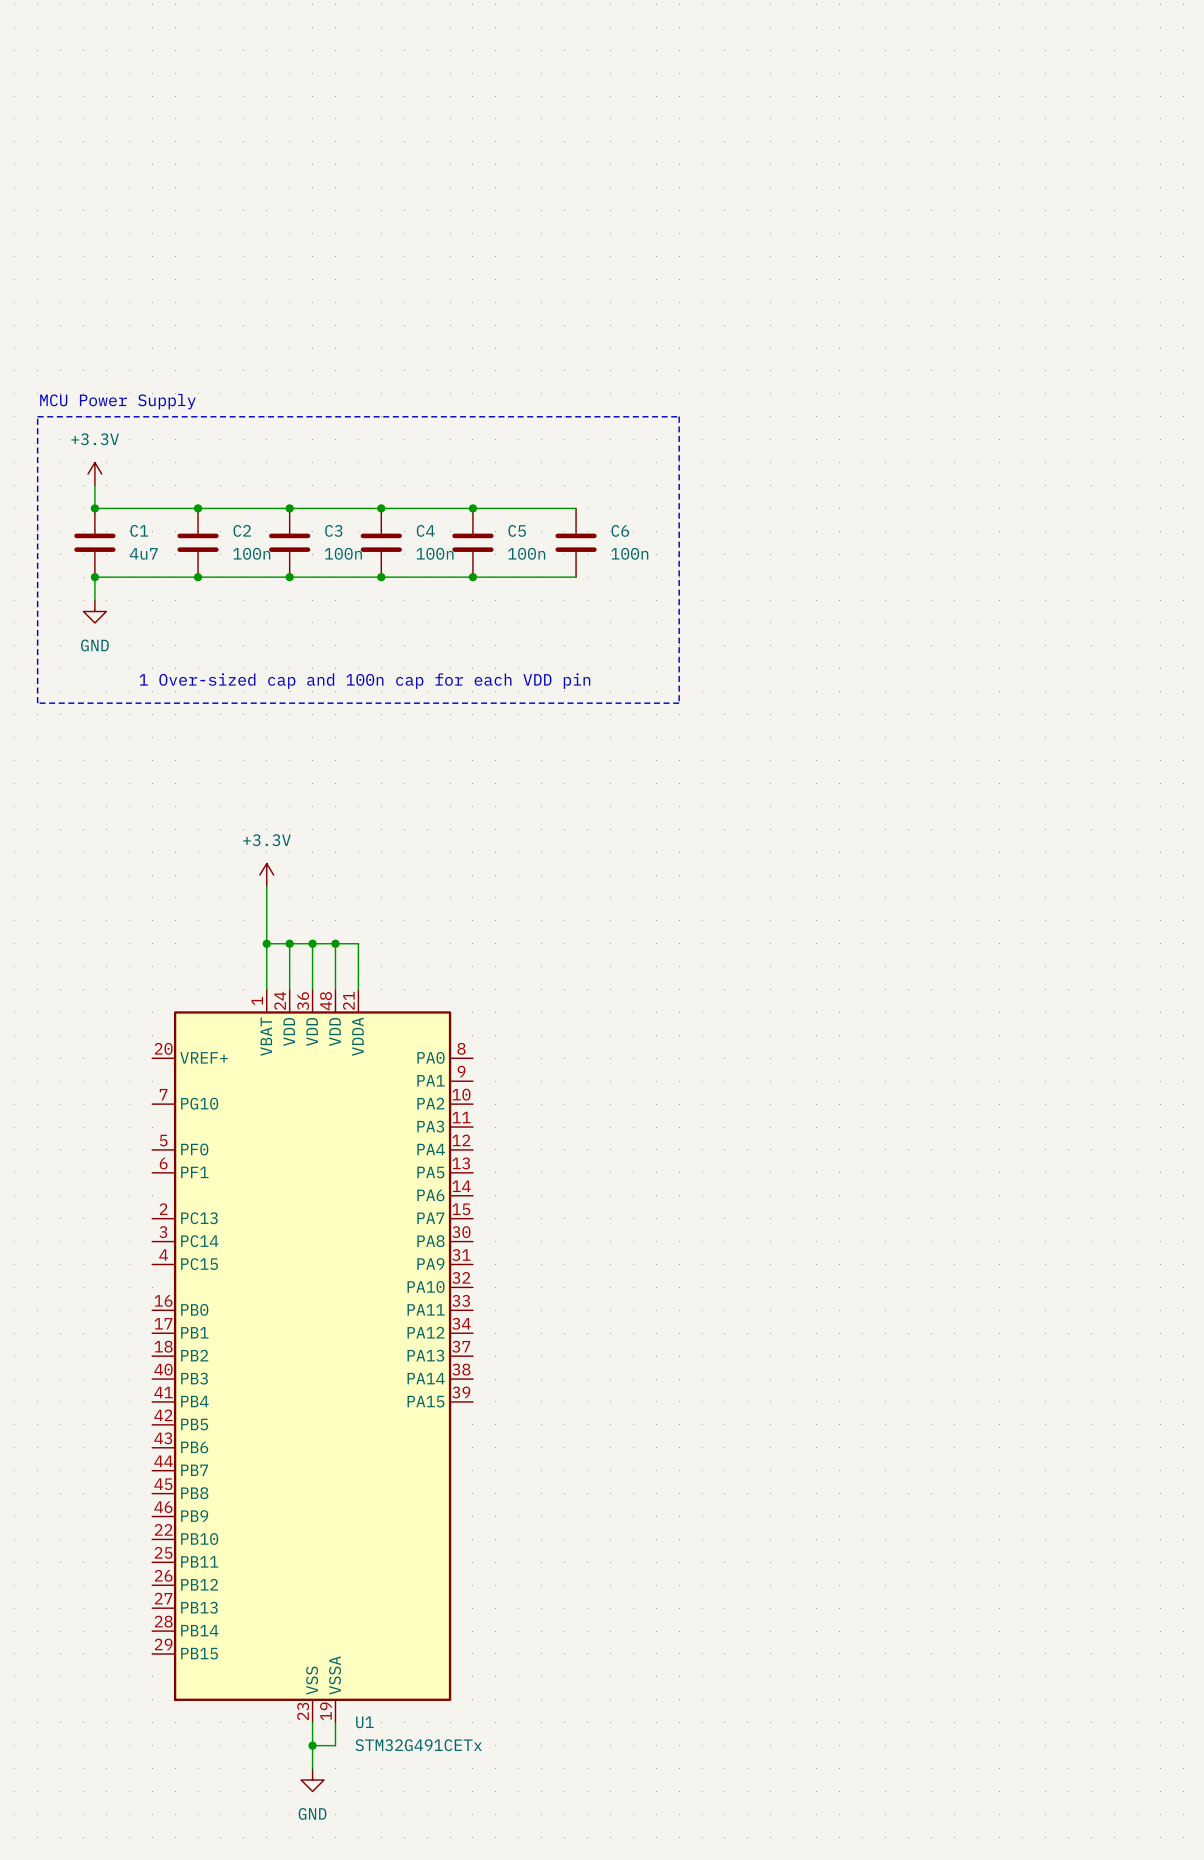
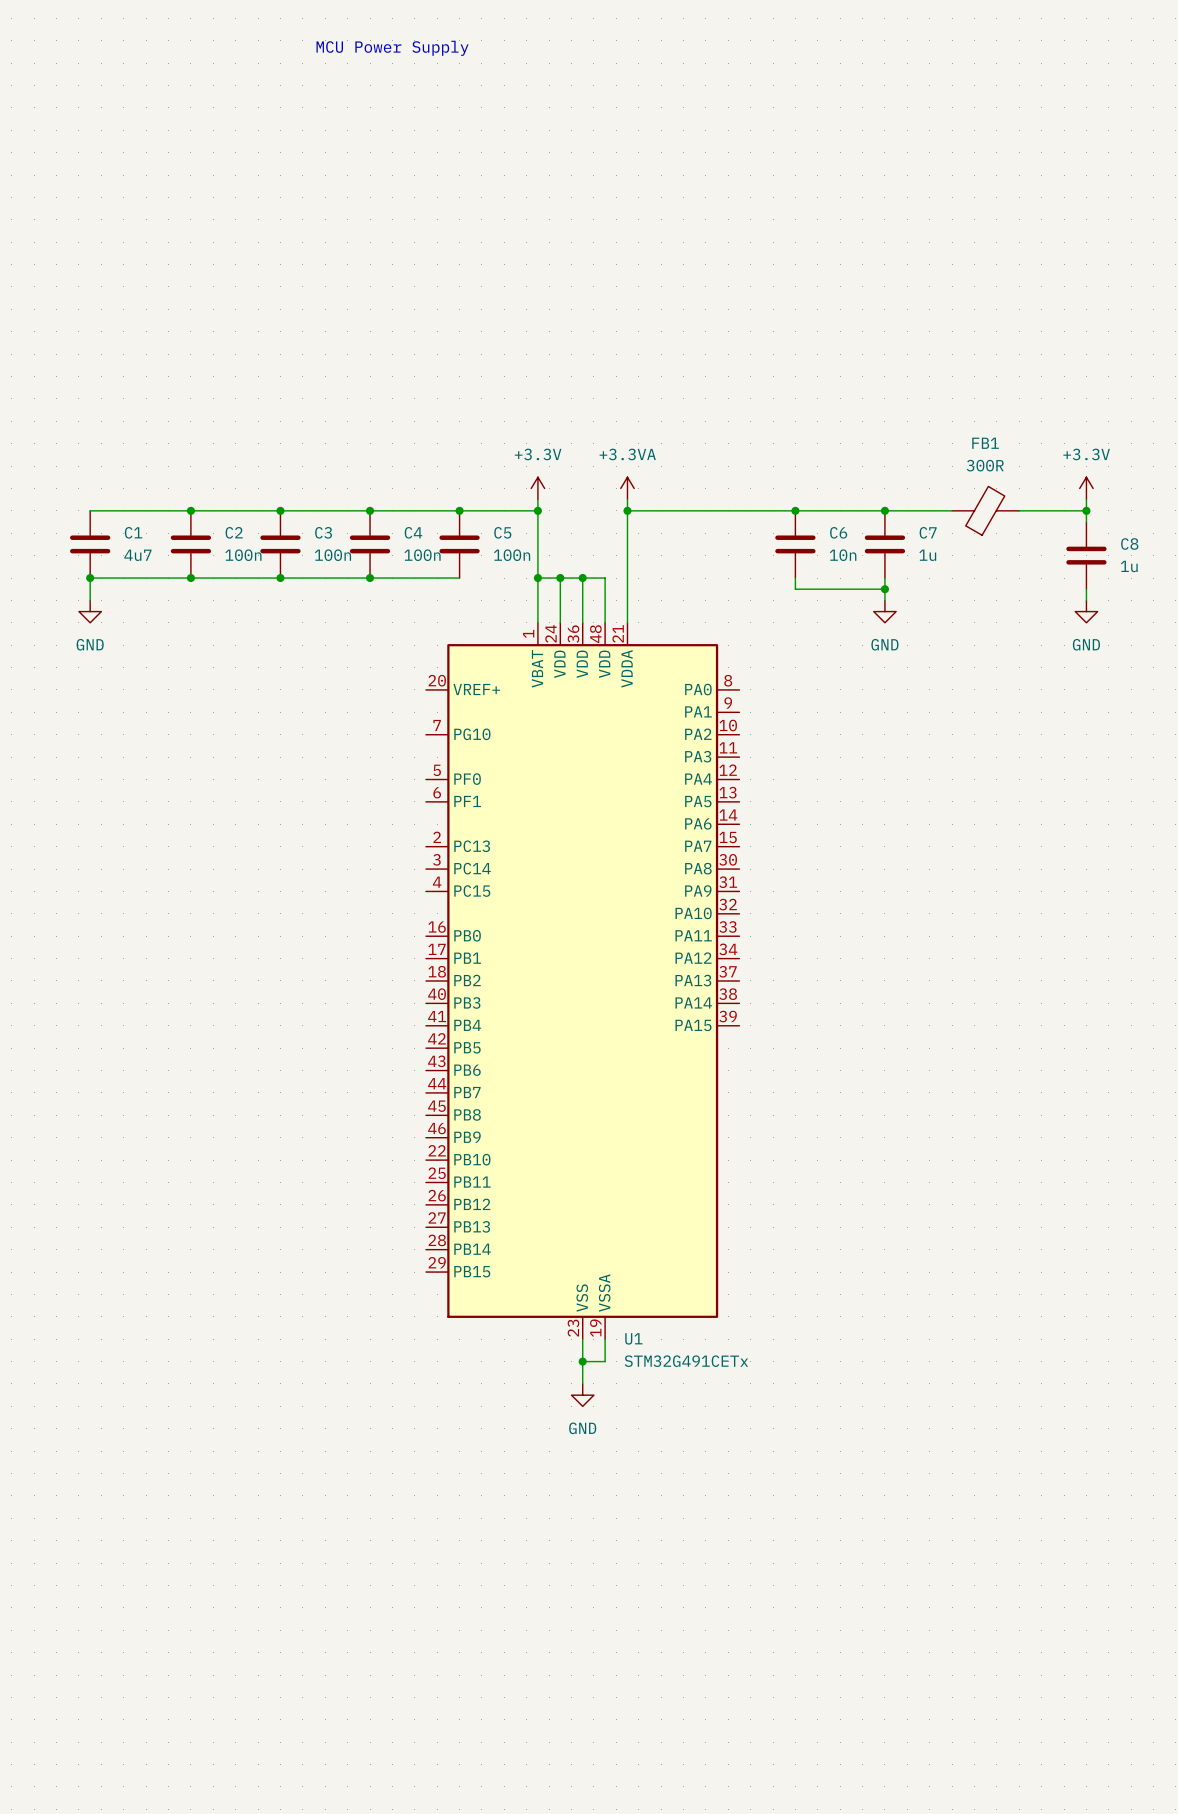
text: none -> MCU Power Supply (392, 48)
text: MCU Power Supply (117, 401) -> none
line: (37, 416) (679, 416) (679, 703) (37, 703) (37, 416) -> none
power symbol: +3.3V (94, 474) -> none
wire: (94, 485) (94, 508) -> none
power symbol: none -> +3.3V (537, 488)
power symbol: none -> +3.3VA (627, 488)
power symbol: none -> +3.3V (1086, 488)
wire: none -> (537, 499) (537, 622)
wire: none -> (627, 499) (627, 622)
wire: none -> (1086, 499) (1086, 522)
junction: (94, 508) -> none
wire: (553, 508) (576, 508) -> none
junction: none -> (537, 510)
wire: none -> (627, 510) (952, 510)
junction: none -> (627, 510)
junction: none -> (795, 510)
junction: none -> (884, 510)
FB1: none -> 300R (985, 510)
wire: none -> (1019, 510) (1086, 510)
junction: none -> (1086, 510)
C6 position: (576, 542) -> (795, 544)
C7: none -> 1u (884, 544)
C6 value: 100n (629, 553) -> 10n (843, 555)
C8: none -> 1u (1086, 555)
wire: (472, 577) (553, 577) -> none
junction: (472, 577) -> none
junction: none -> (537, 578)
junction: none -> (560, 578)
wire: none -> (582, 578) (582, 622)
junction: none -> (582, 578)
wire: none -> (795, 578) (795, 589) (884, 589)
wire: none -> (884, 578) (884, 600)
junction: none -> (884, 589)
wire: none -> (1086, 589) (1086, 600)
power symbol: none -> GND (884, 611)
power symbol: none -> GND (1086, 611)
wire: none -> (560, 622) (560, 578) (605, 578) (605, 622)
text: 1 Over-sized cap and 100n cap for each VDD pin (364, 681) -> none
power symbol: +3.3V (266, 875) -> none
wire: (266, 886) (266, 989) -> none
wire: (266, 943) (358, 943) (358, 989) -> none
junction: (266, 943) -> none
wire: (289, 943) (289, 989) -> none
junction: (289, 943) -> none
wire: (312, 943) (312, 989) -> none
junction: (312, 943) -> none
wire: (335, 943) (335, 989) -> none
junction: (335, 943) -> none
U1 position: (312, 1356) -> (582, 980)
wire: none -> (582, 1339) (582, 1383)
wire: none -> (605, 1339) (605, 1361) (582, 1361)
junction: none -> (582, 1361)
power symbol: none -> GND (582, 1395)
wire: (312, 1722) (312, 1768) -> none
wire: (335, 1722) (335, 1745) (312, 1745) -> none
junction: (312, 1745) -> none
power symbol: GND (312, 1780) -> none

